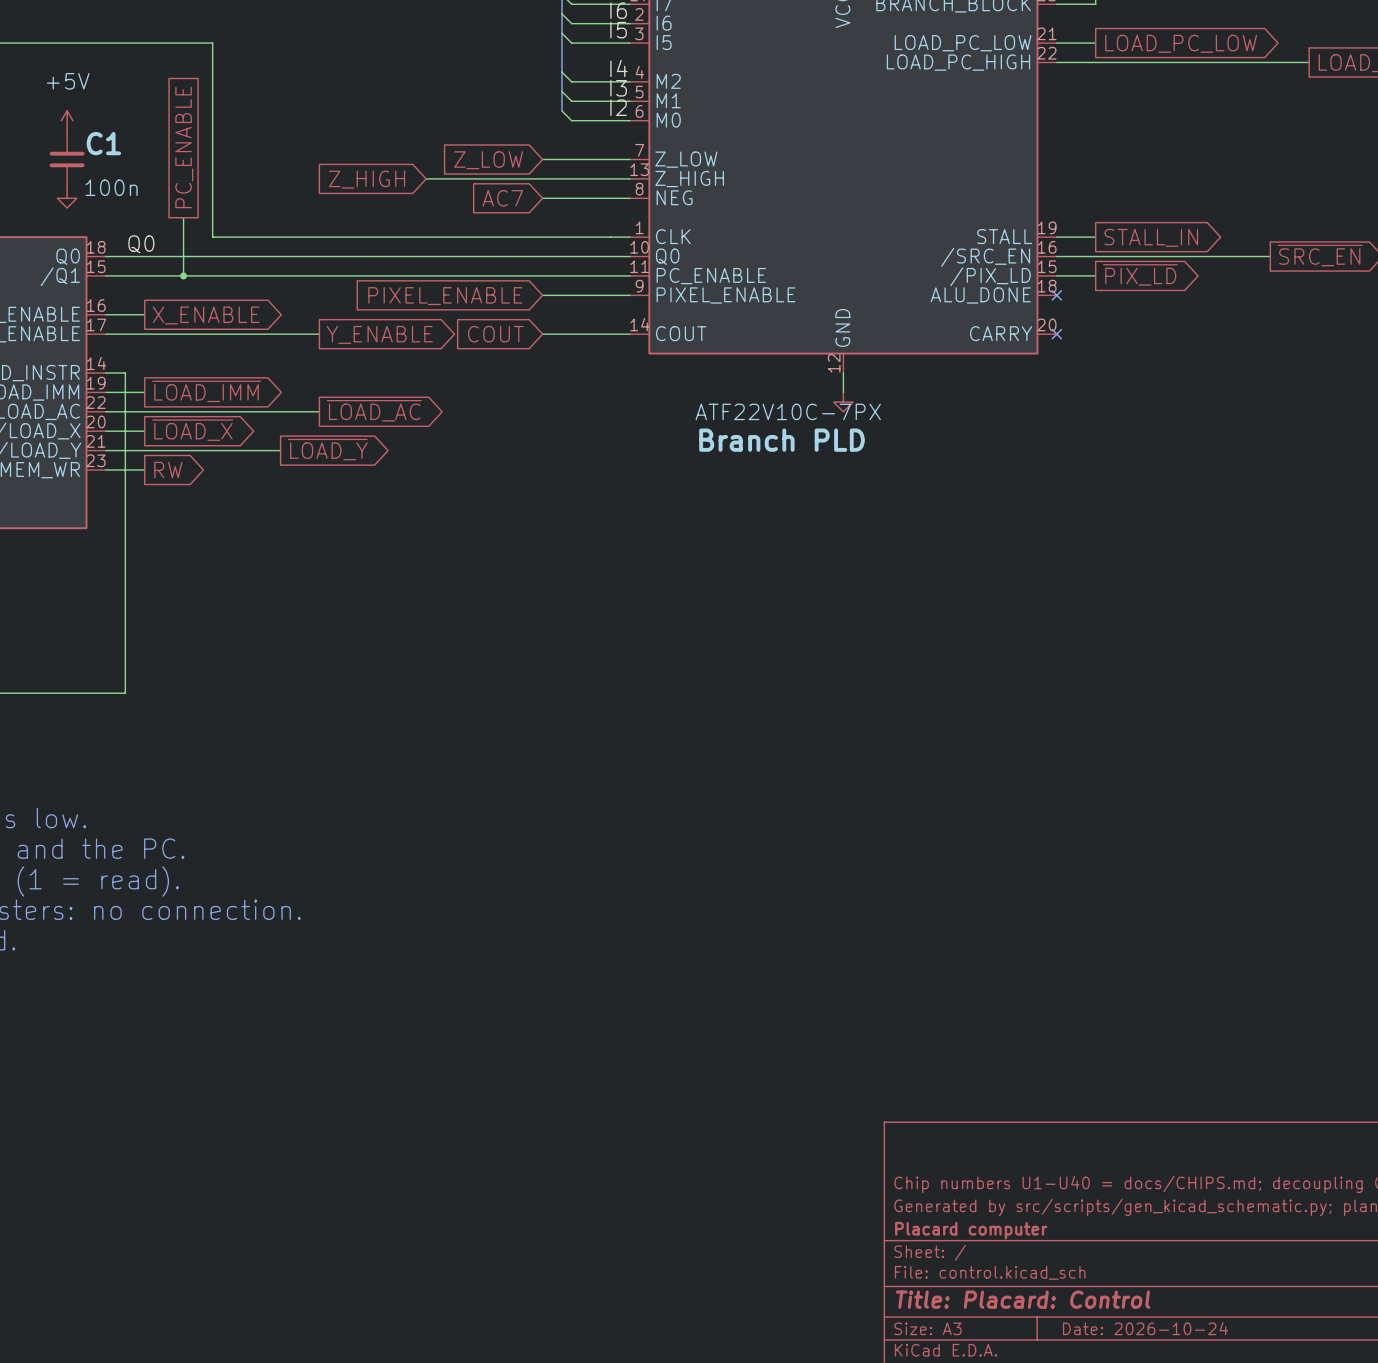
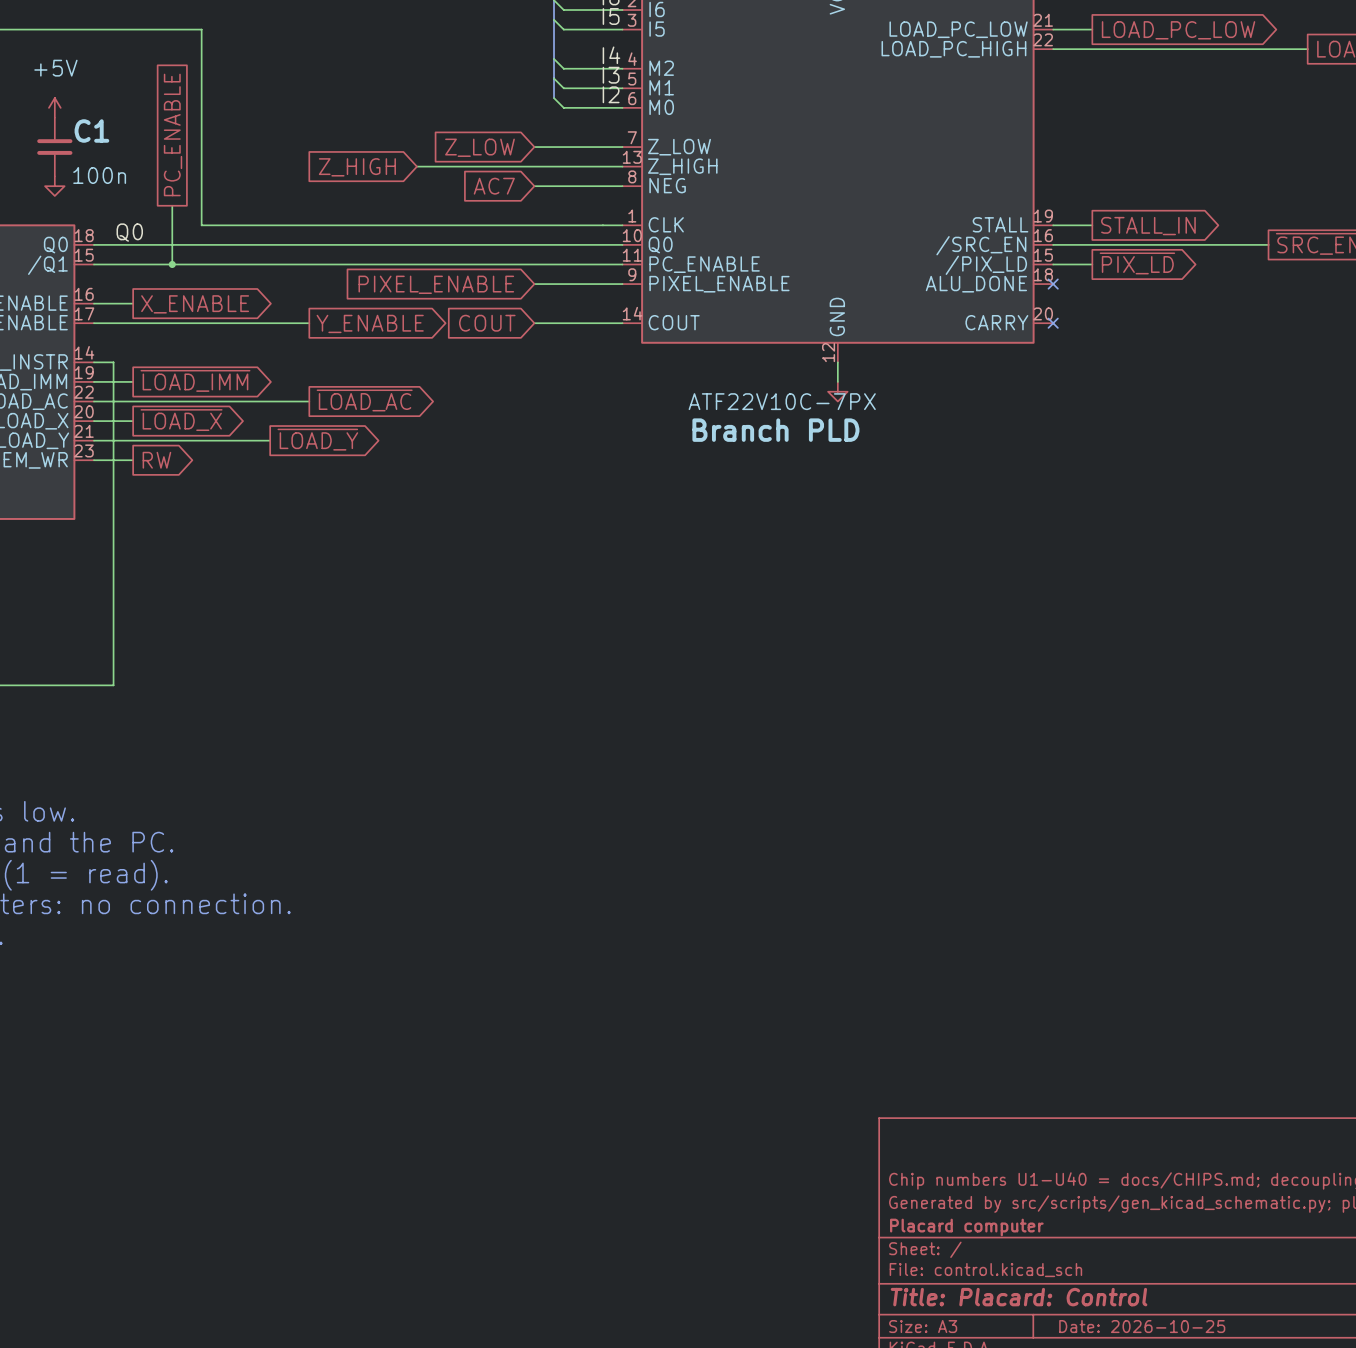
title block: Date: 2026-10-24 (1145, 1328) -> Date: 2026-10-25 (1142, 1326)

